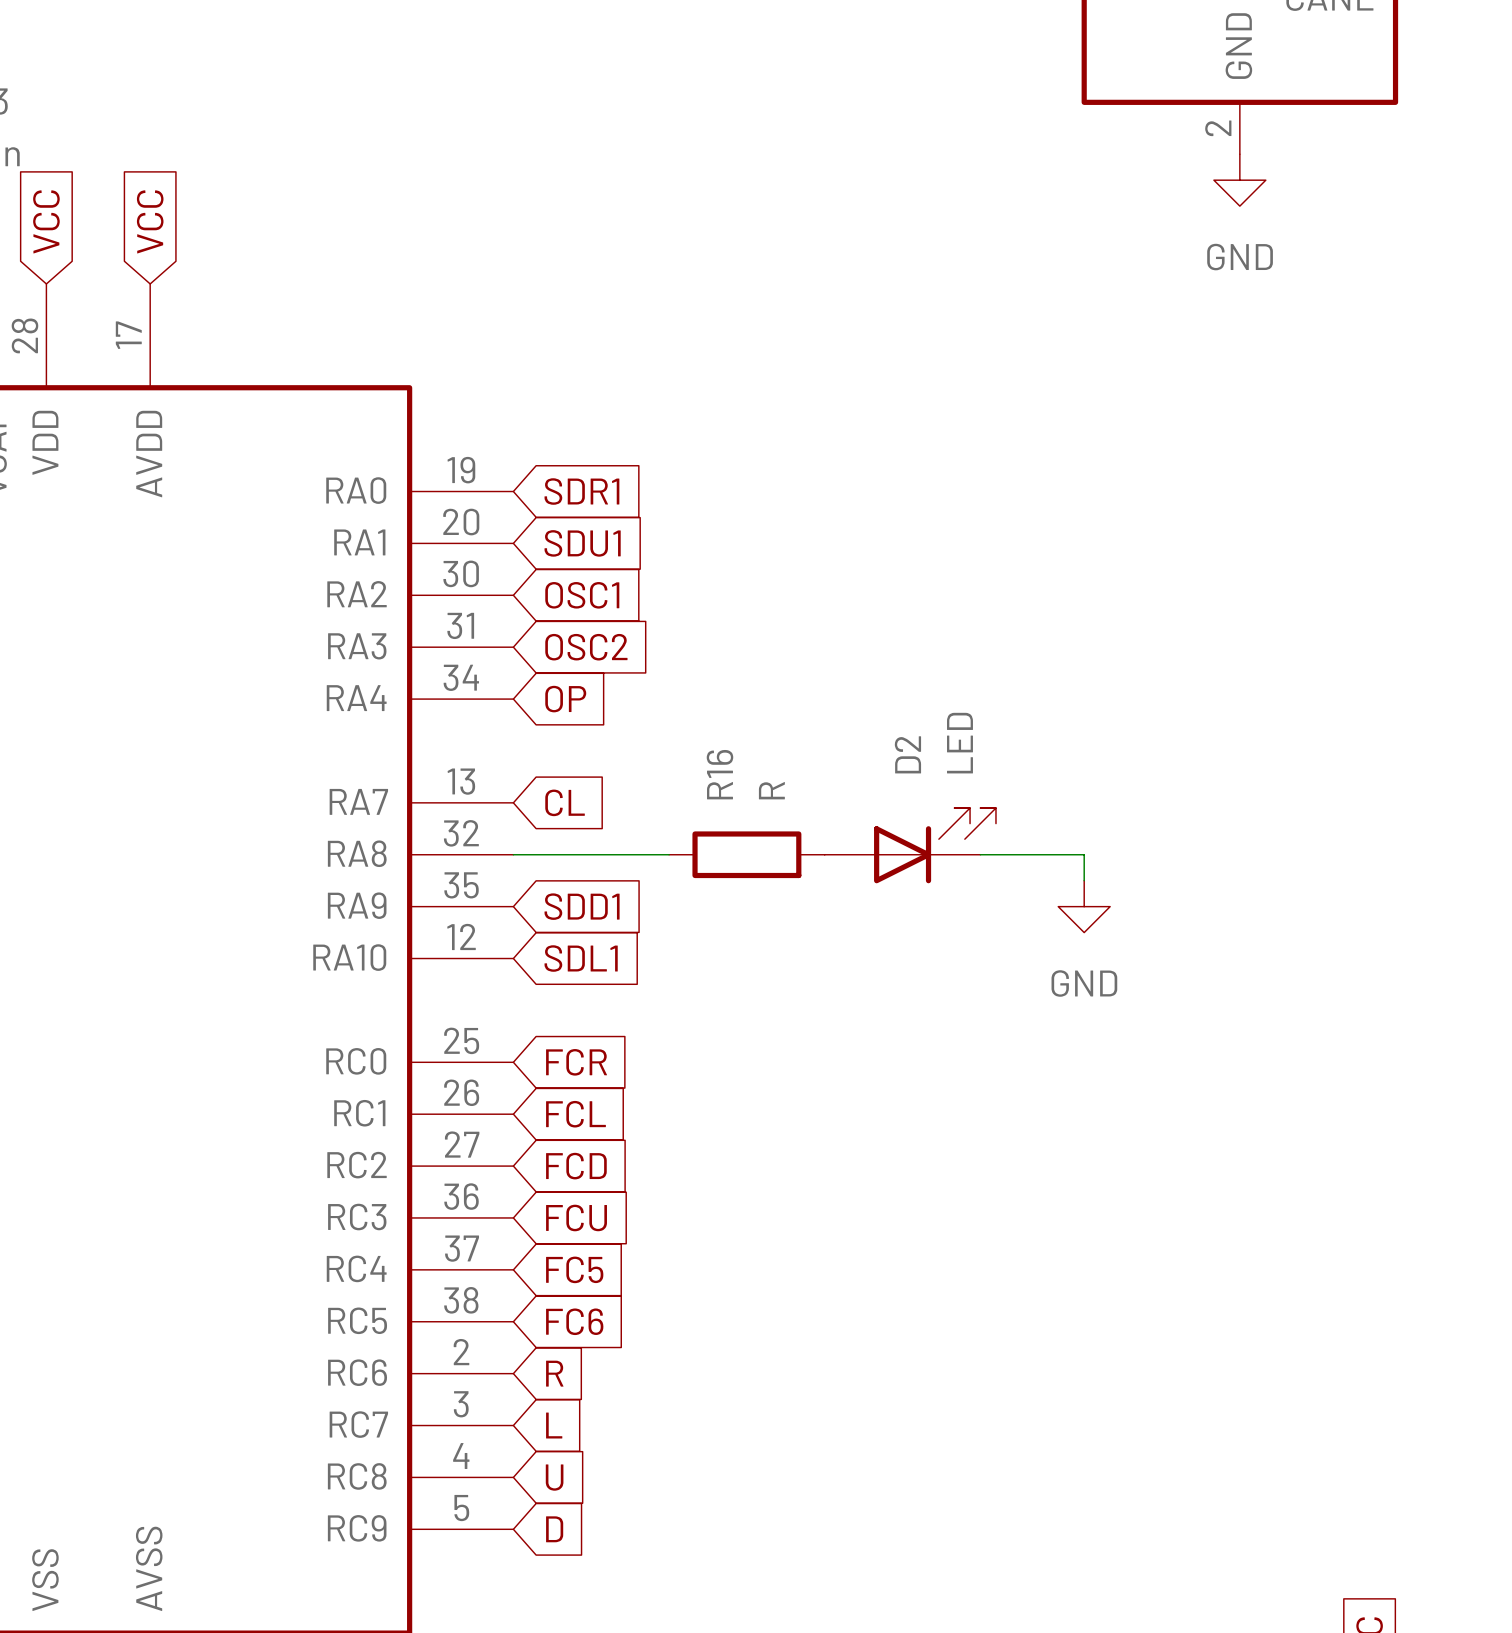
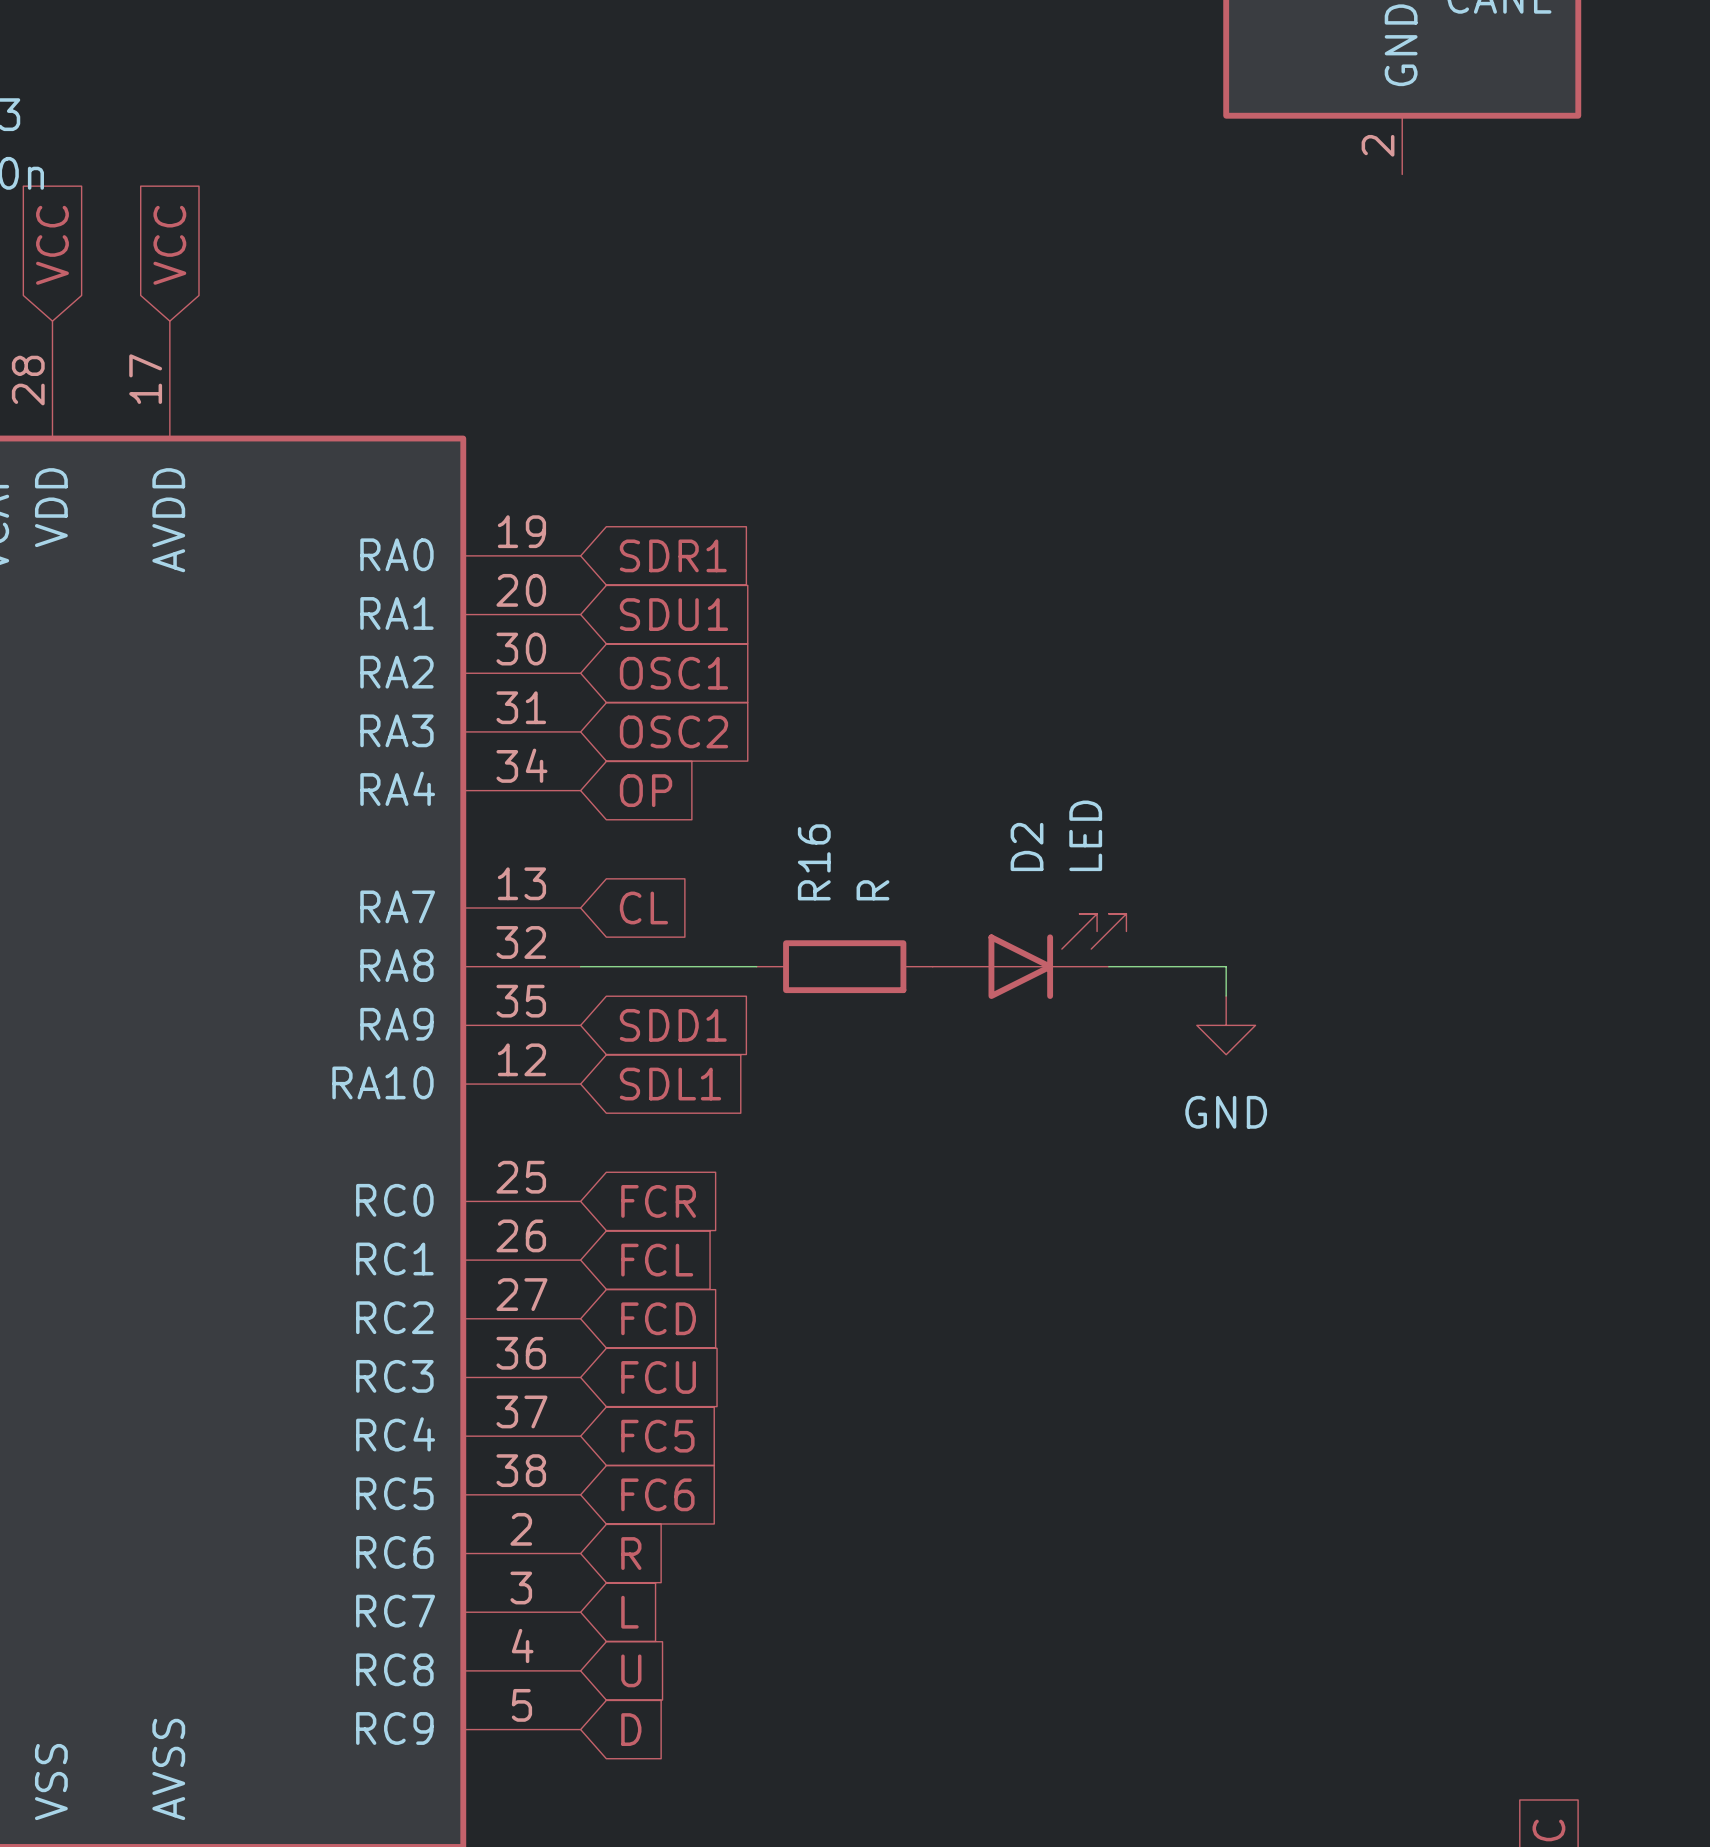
power symbol: GND (1239, 180) -> none

